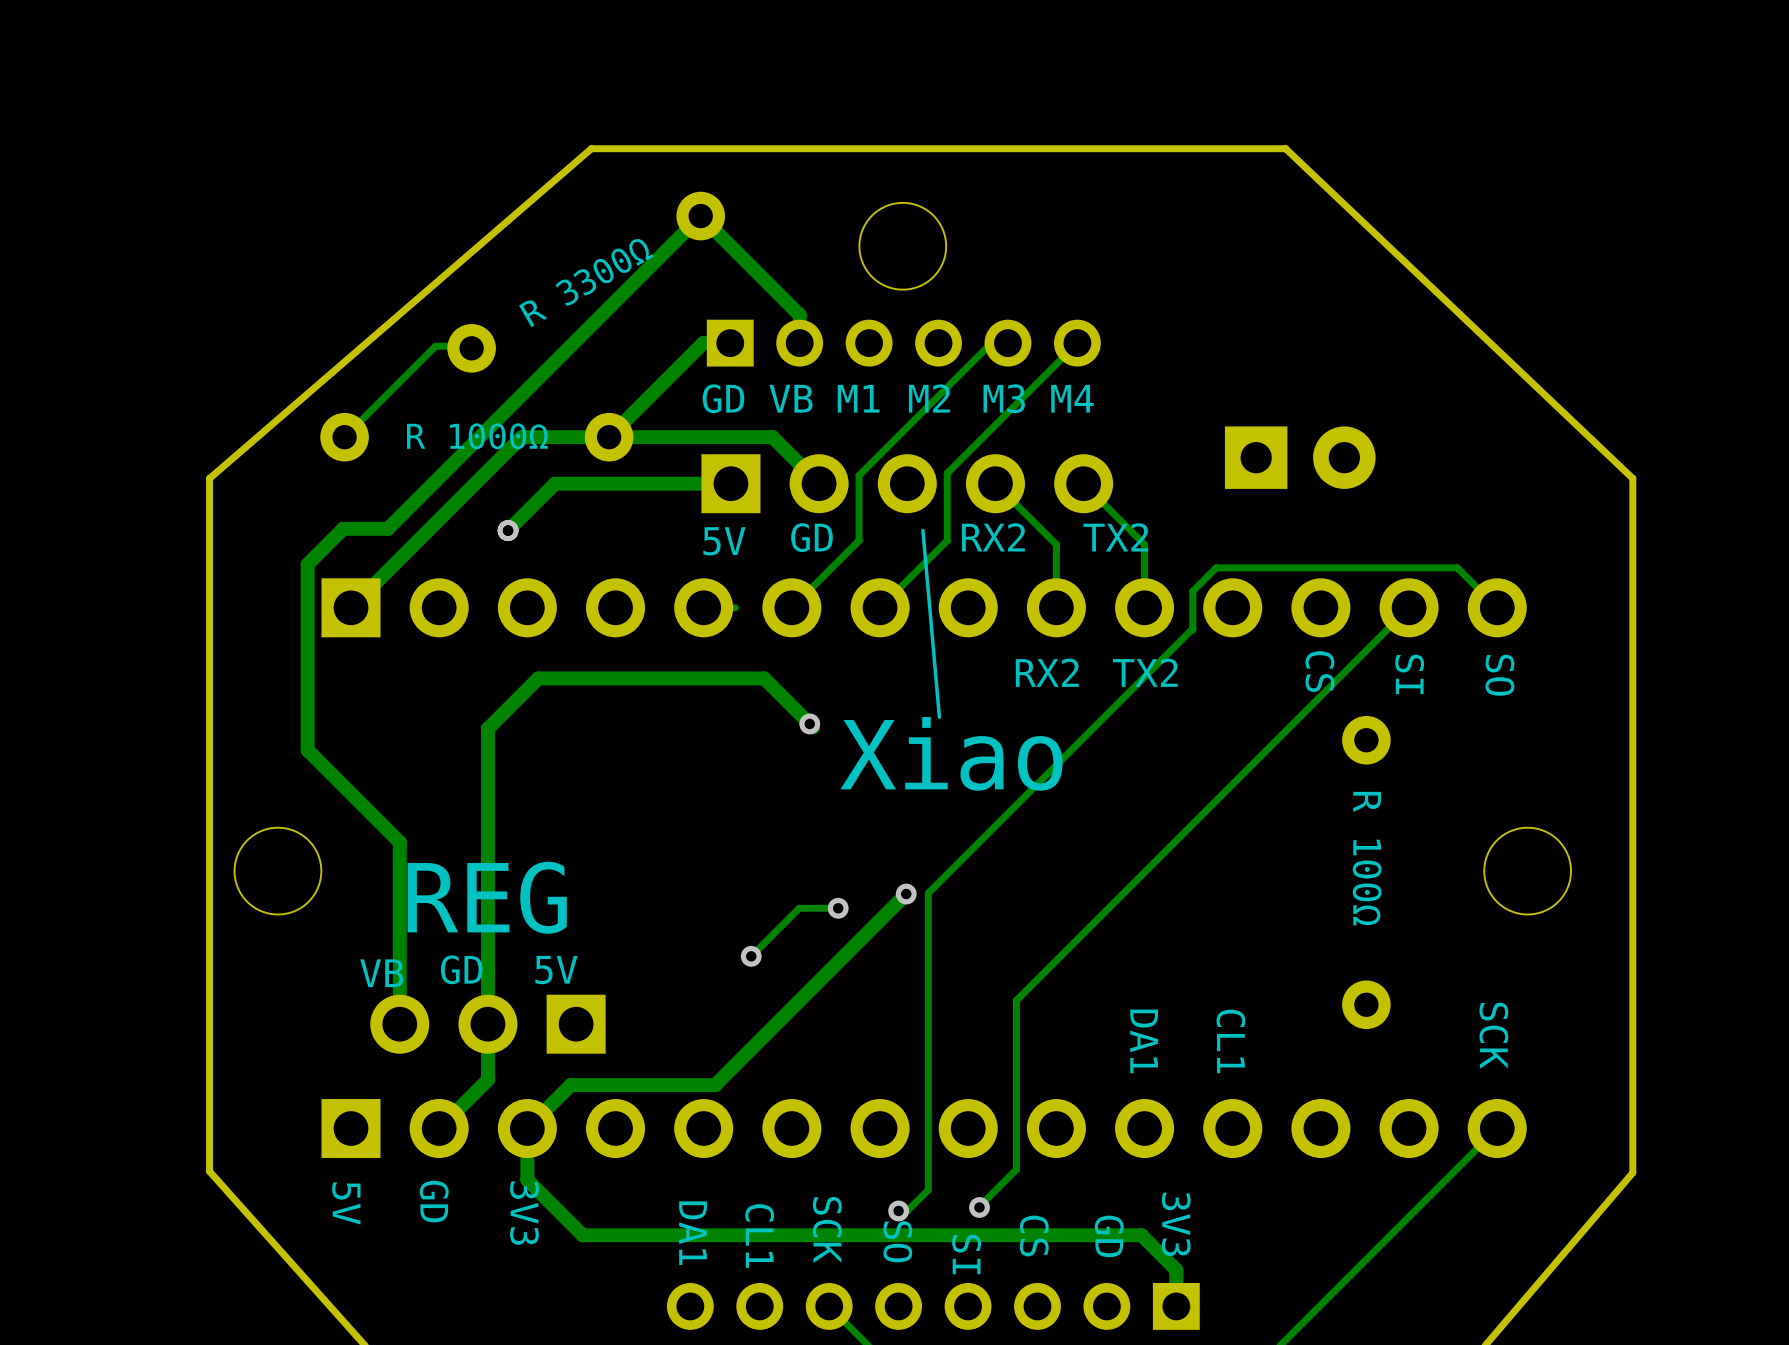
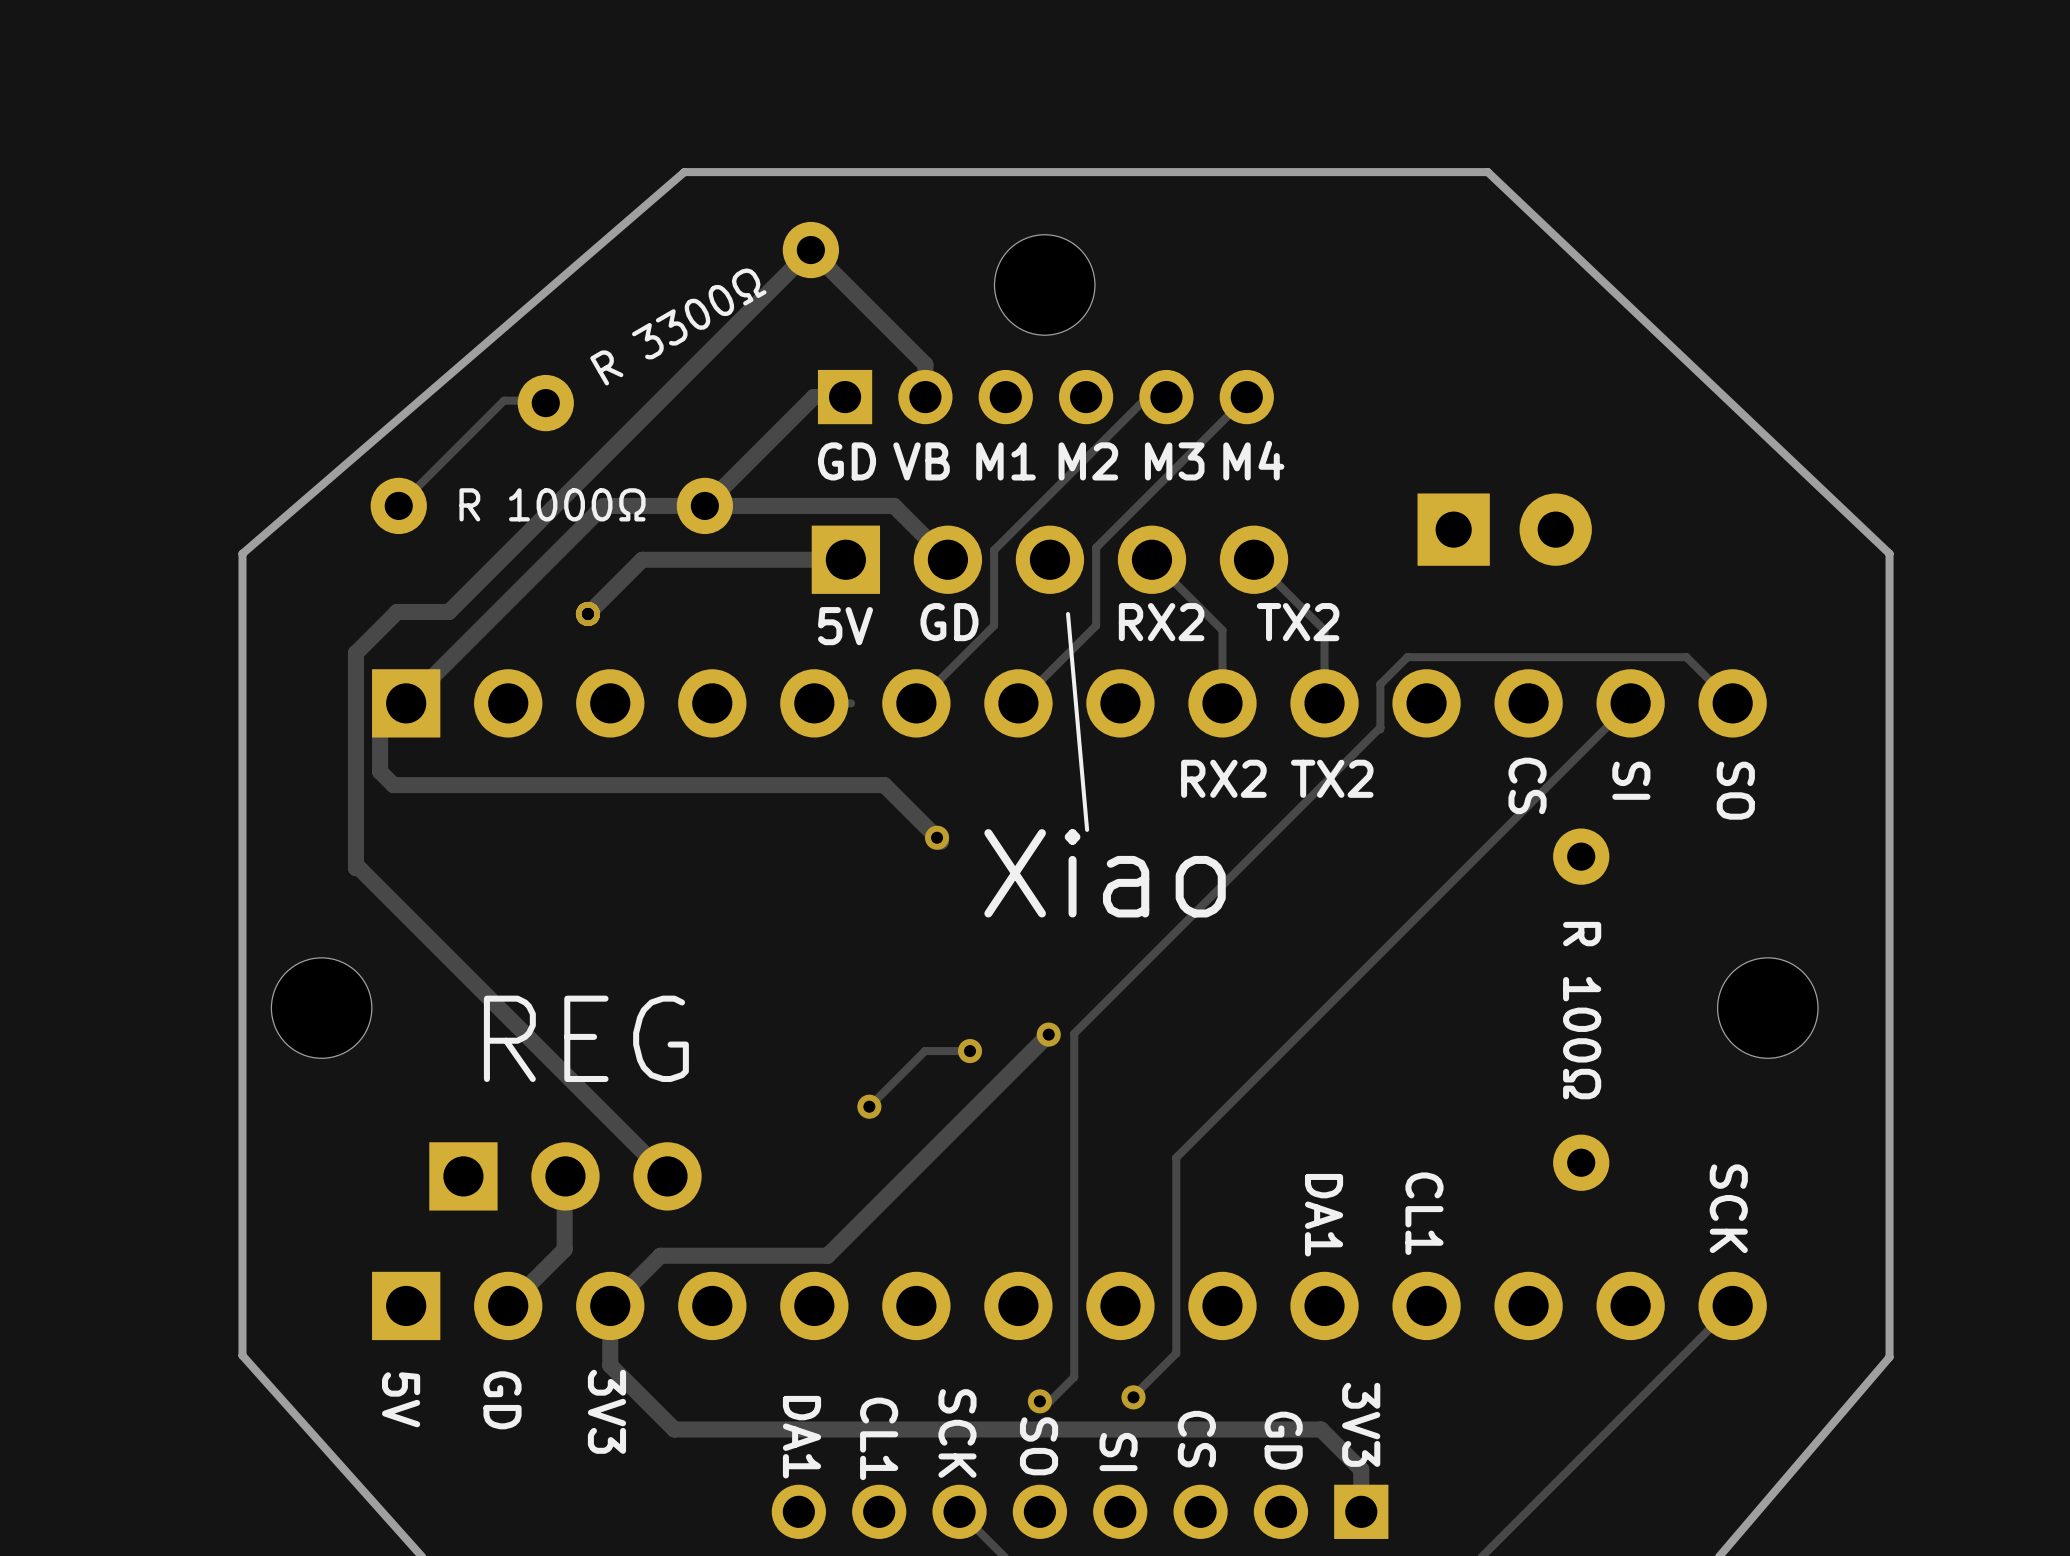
track: (538, 678) (487, 728) (487, 1024) -> (622, 785) (393, 785) (380, 771) (380, 729) (406, 703)
track: (307, 750) (399, 842) (399, 1024) -> (355, 868) (359, 868) (667, 1176)
text: GD (461, 969) -> none
text: 5V (556, 970) -> none
text: VB (381, 973) -> none
part rotation: 0° (487, 1024) -> 180° (565, 1176)

